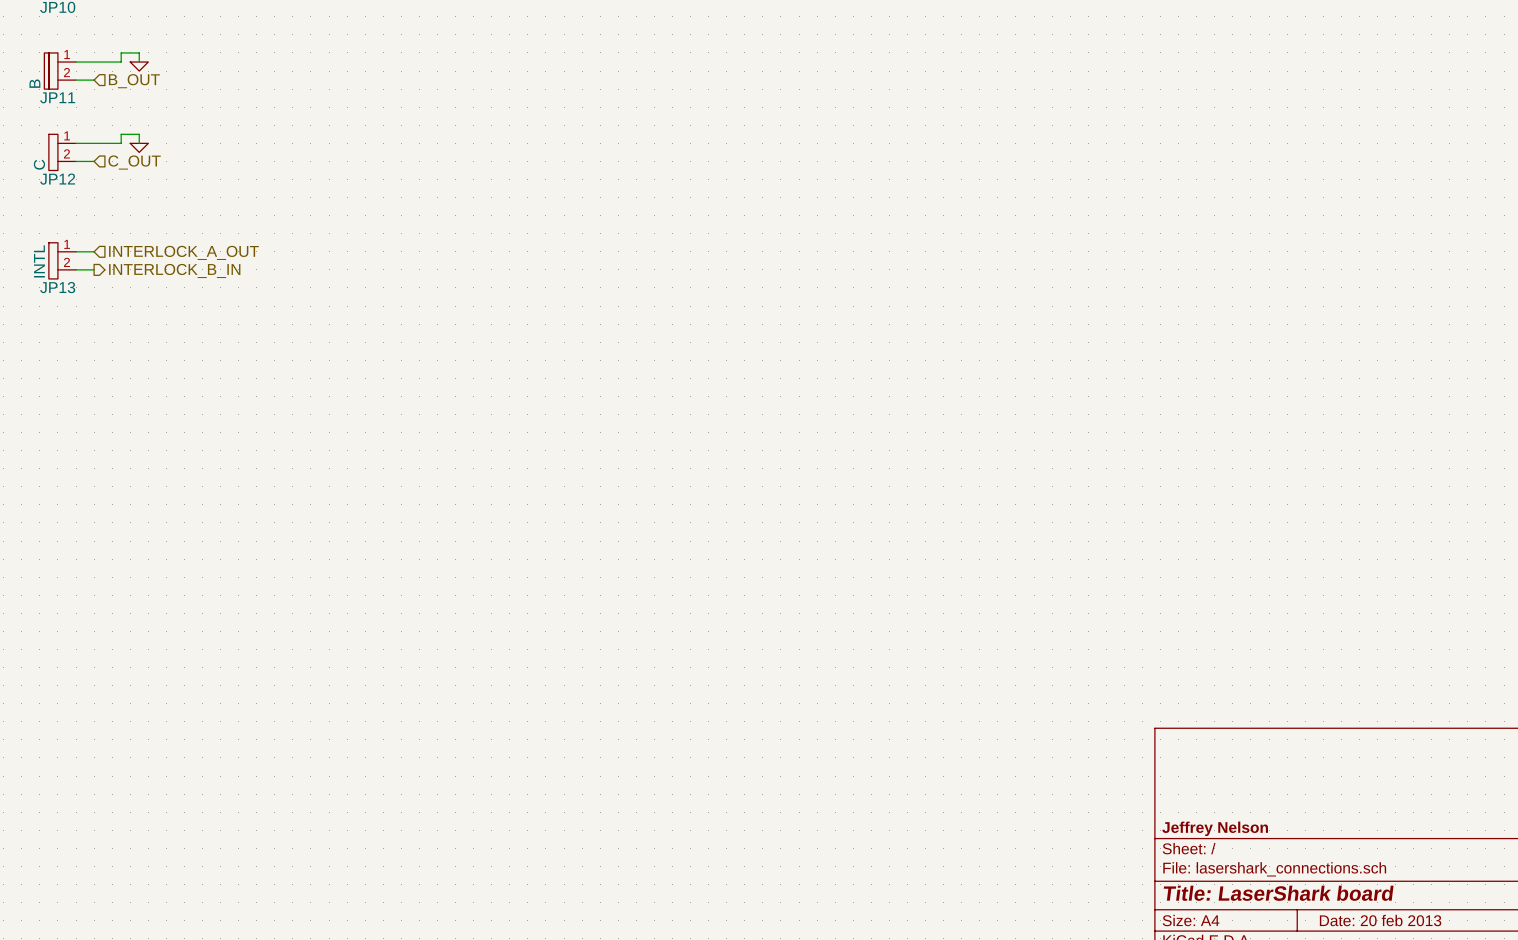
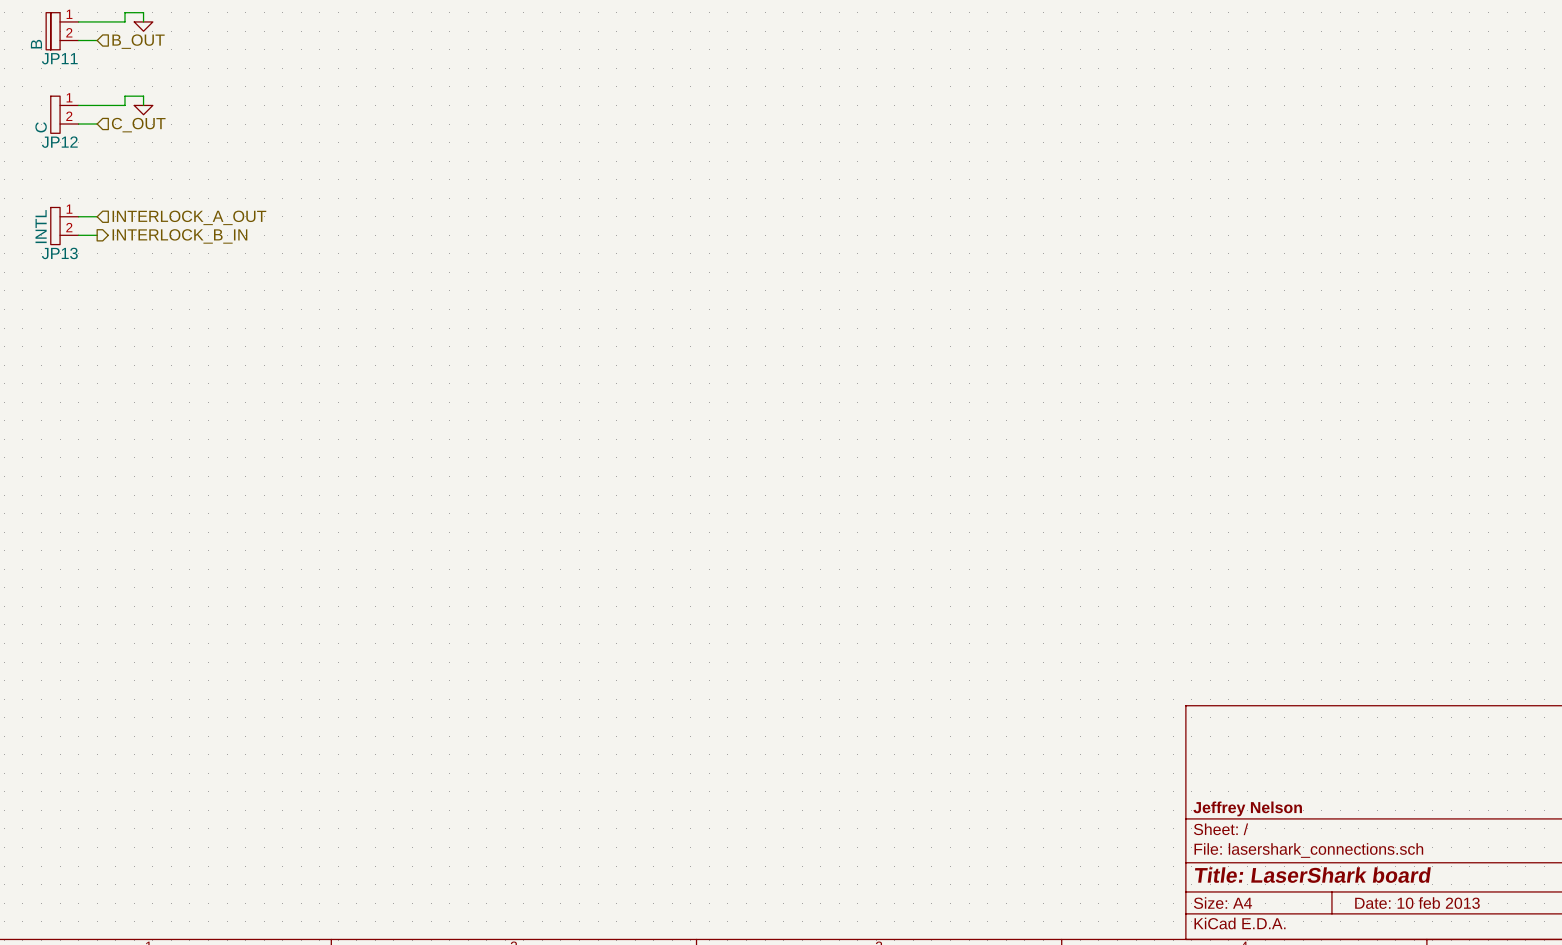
title block: Date: 20 feb 2013 (1380, 920) -> Date: 10 feb 2013 (1417, 903)

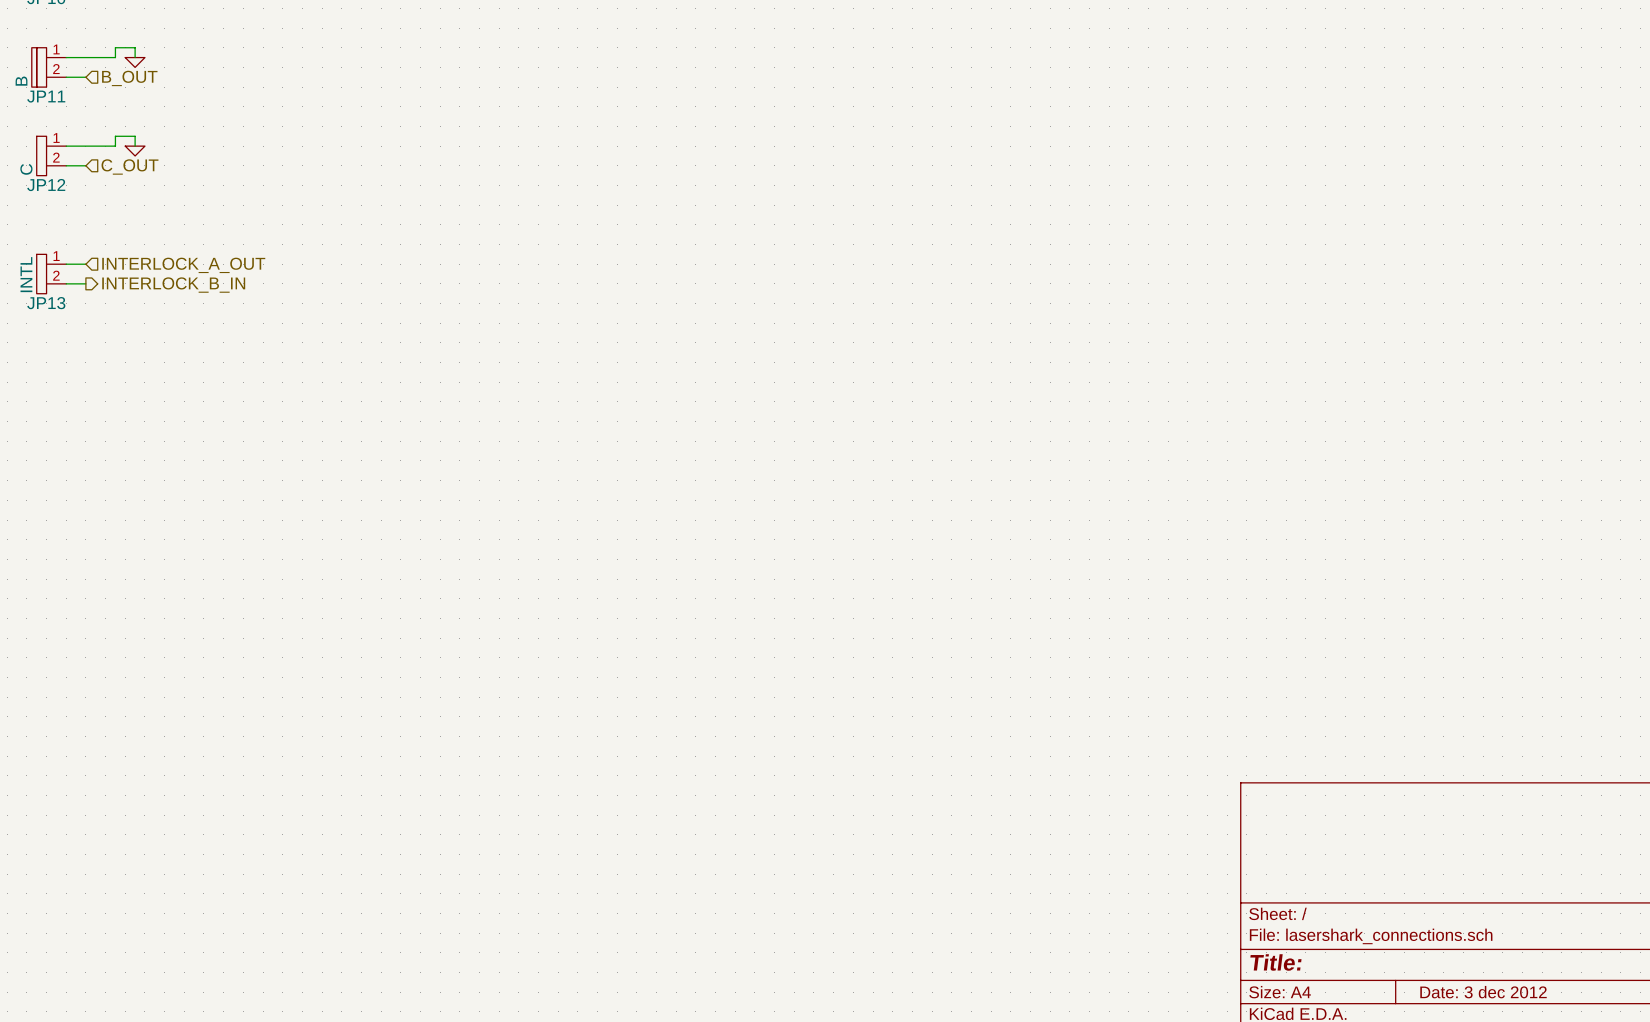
title block: Jeffrey Nelson (1247, 808) -> none
title block: Title: LaserShark board (1312, 875) -> Title: (1275, 962)
title block: Date: 10 feb 2013 (1417, 903) -> Date: 3 dec 2012 (1483, 992)

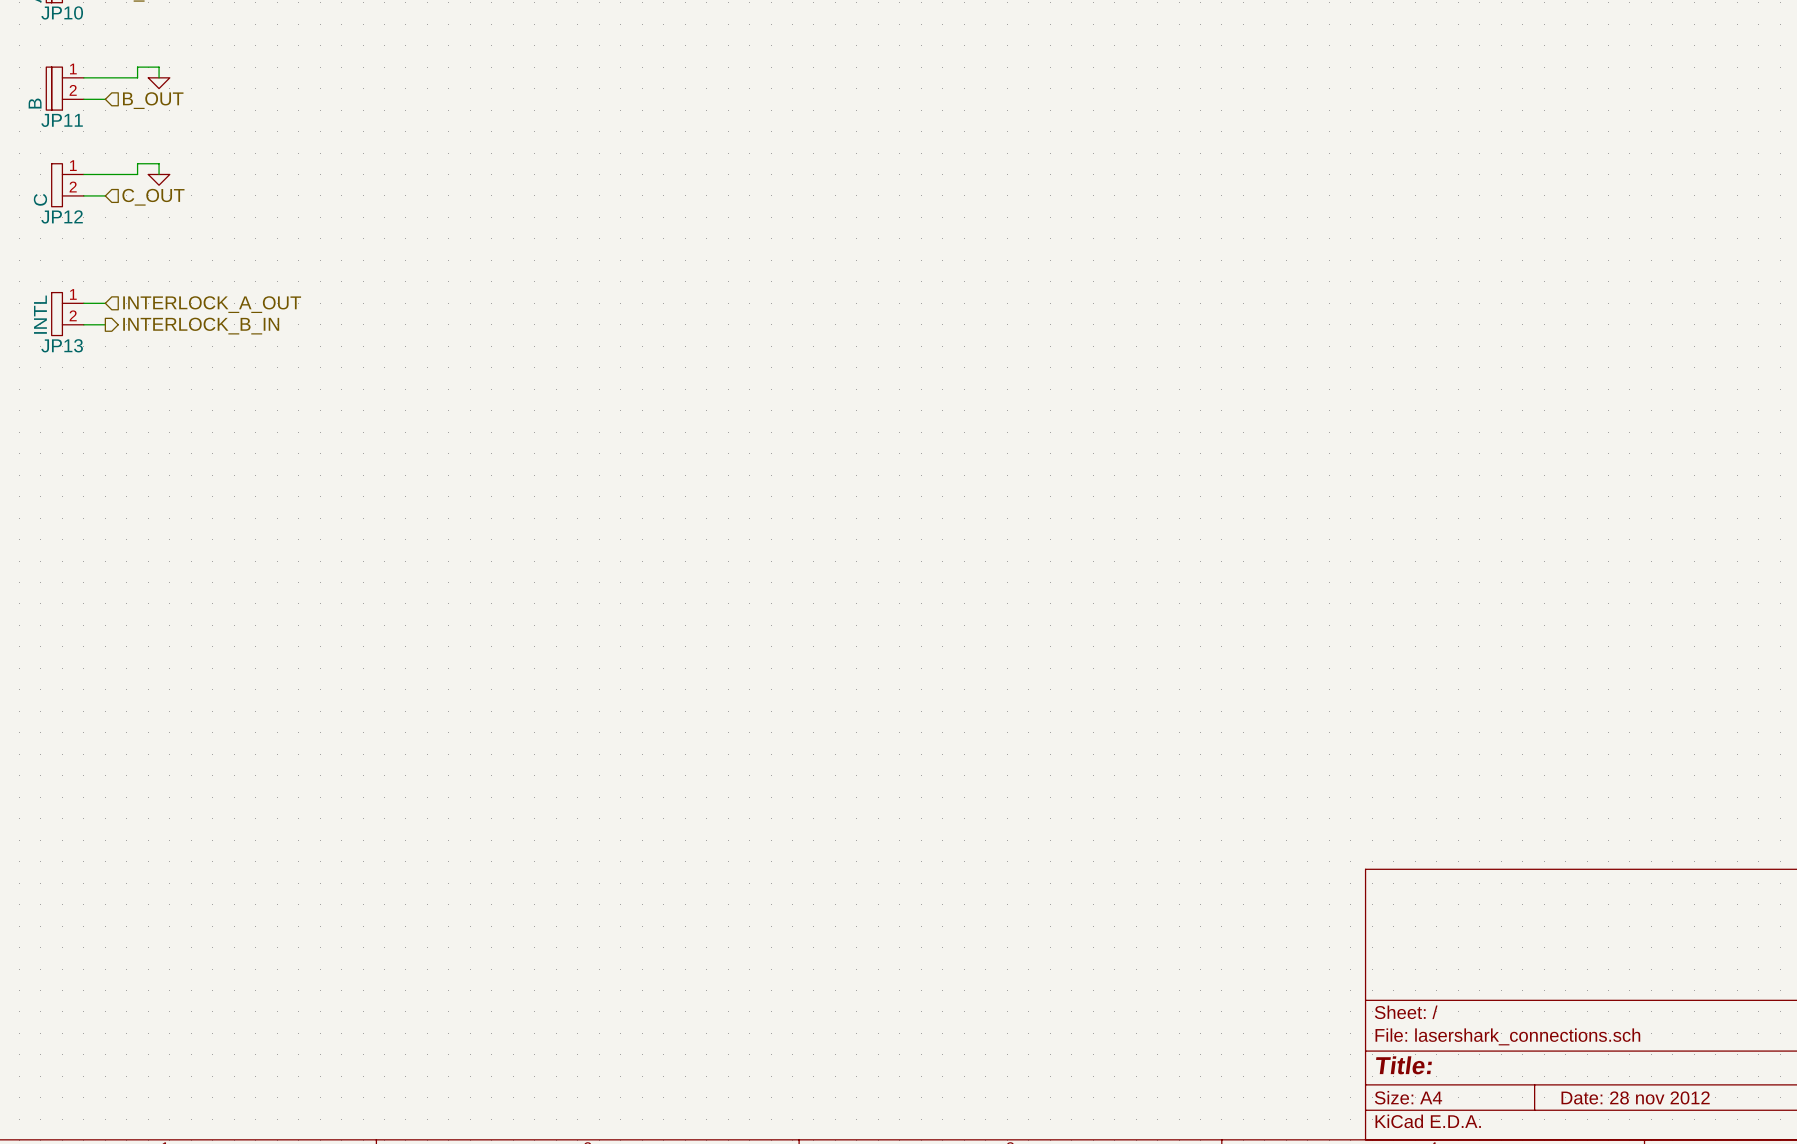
title block: Date: 3 dec 2012 (1483, 992) -> Date: 28 nov 2012 (1635, 1097)

